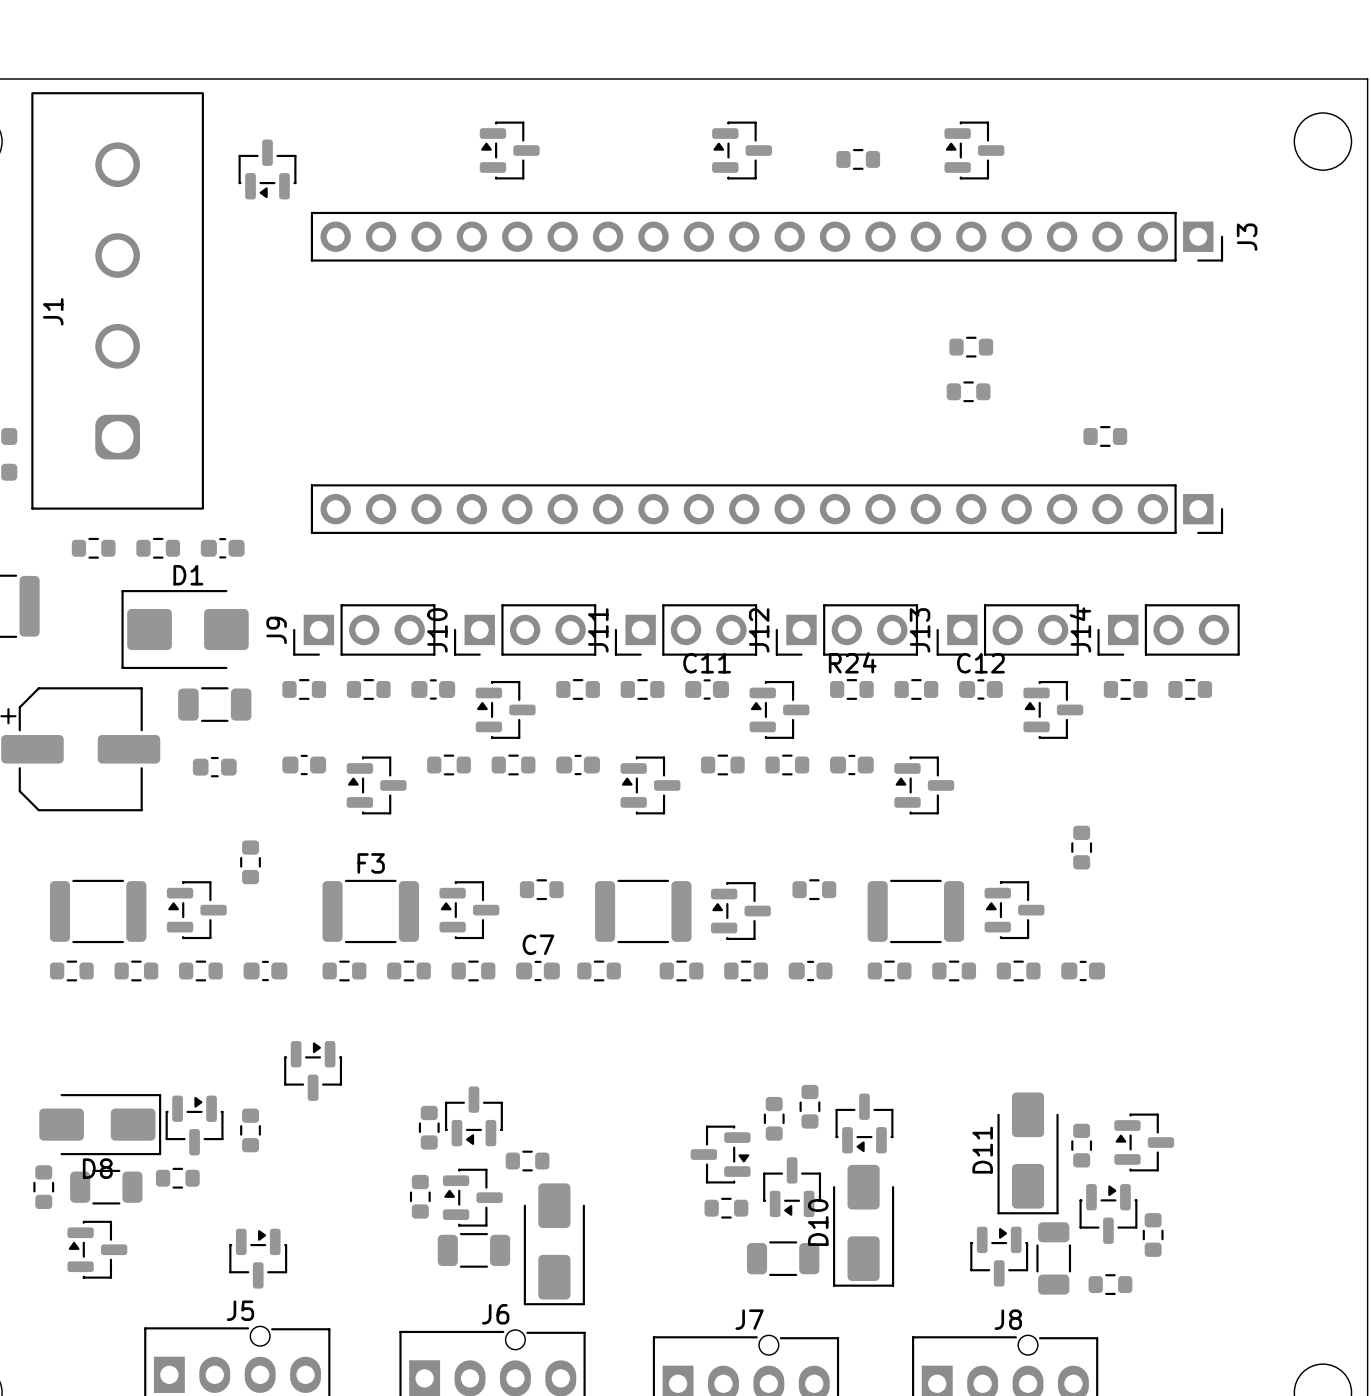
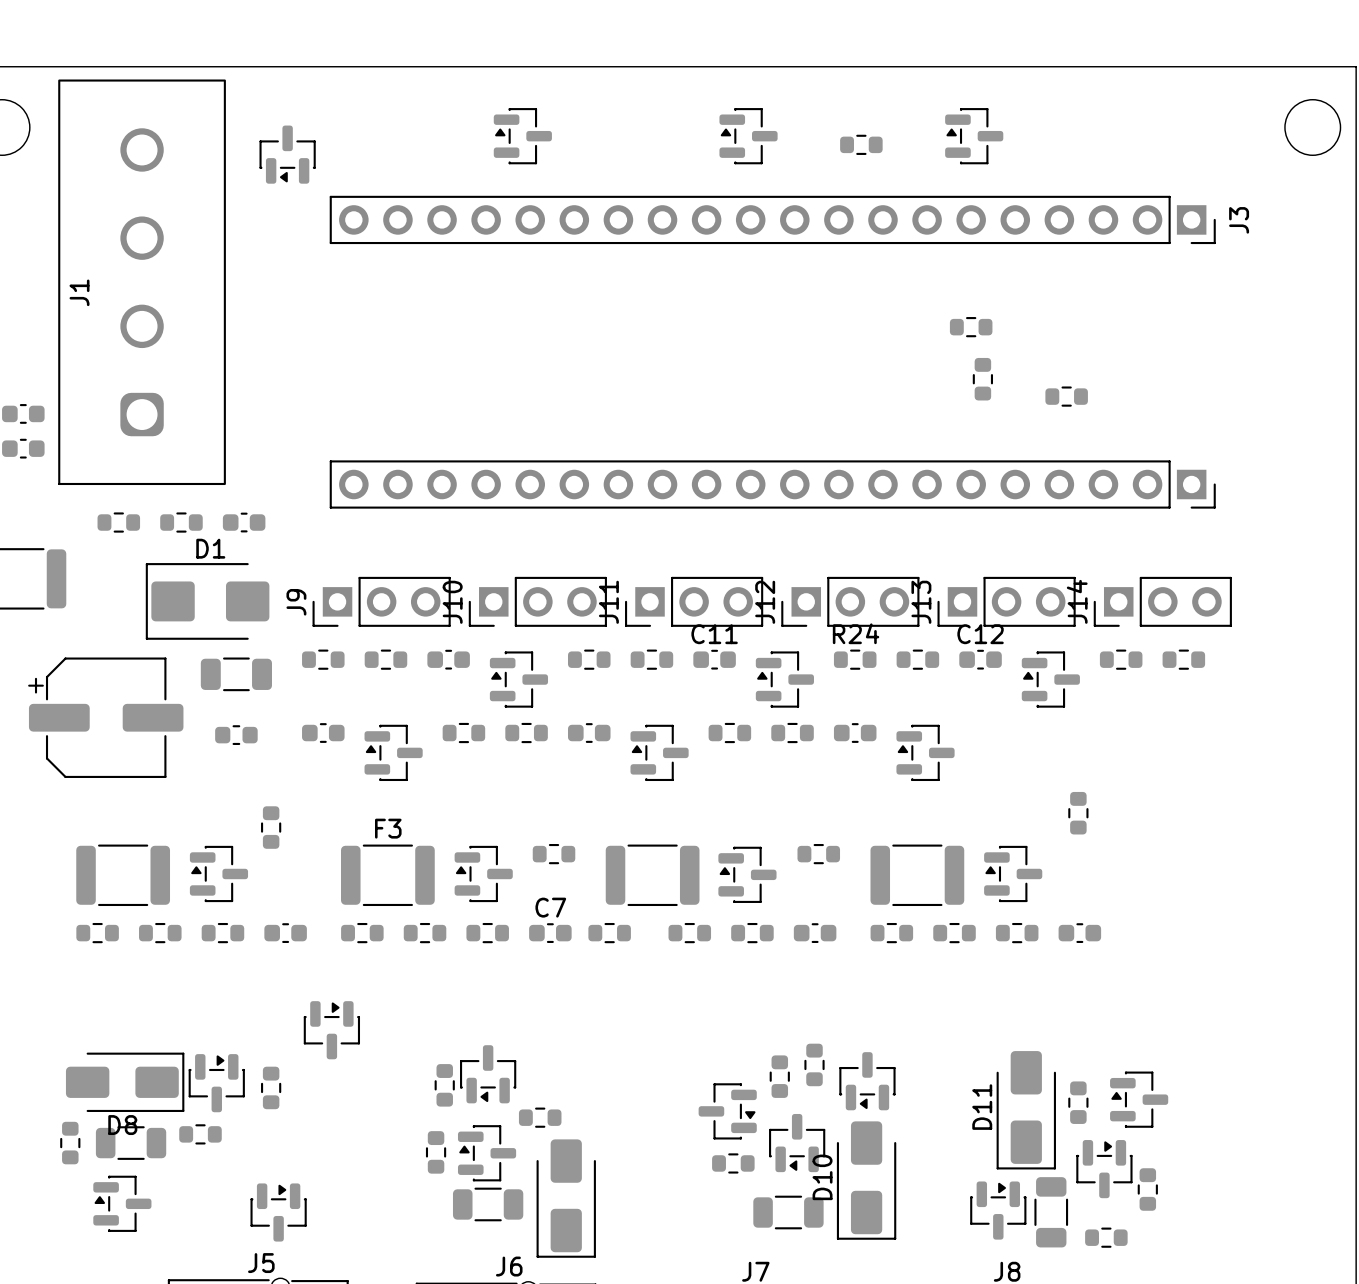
part rotation: 0° (968, 391) -> 90° clockwise (982, 379)
part position: (1105, 436) -> (1066, 396)

